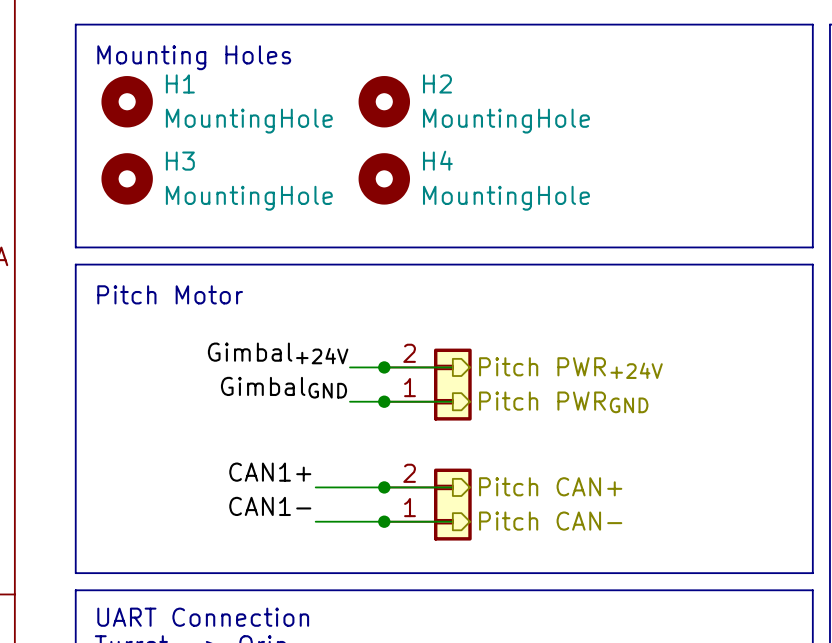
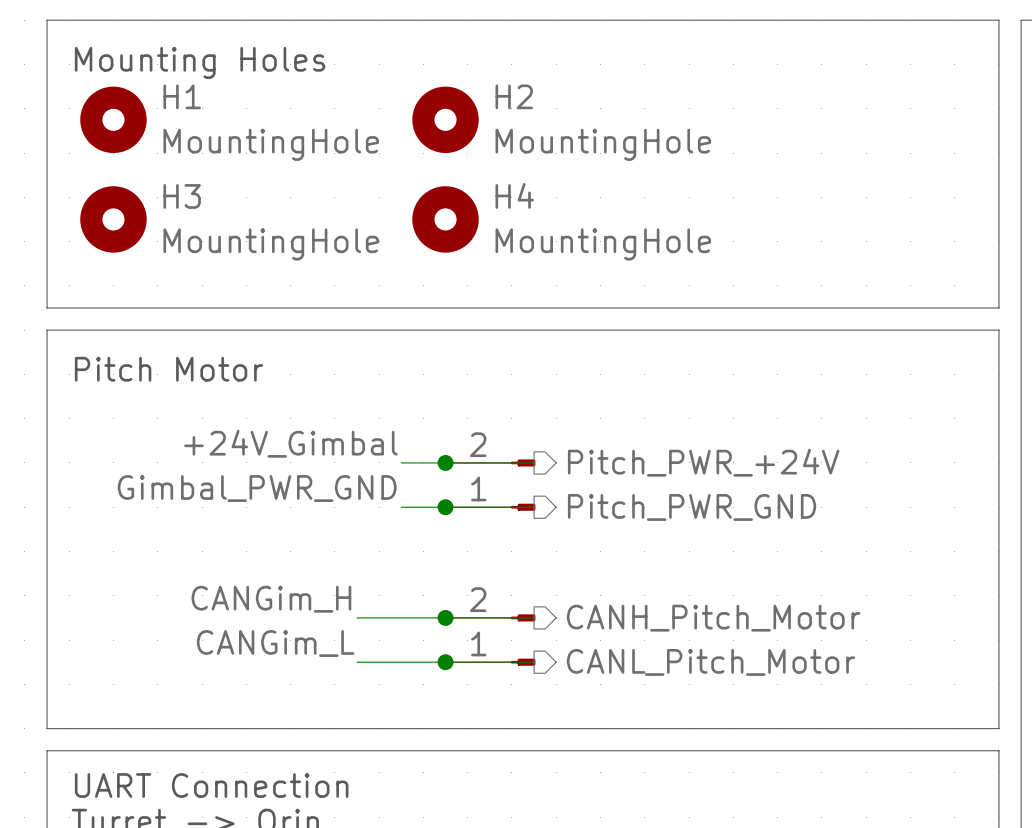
part symbol: [384, 348, 472, 421] -> [445, 459, 536, 511]
label: Gimbal+24V (278, 353) -> +24V_Gimbal (290, 443)
hierarchical label: Pitch PWR+24V (570, 368) -> Pitch_PWR_+24V (703, 462)
label: GimbalGND (284, 387) -> Gimbal_PWR_GND (257, 488)
hierarchical label: Pitch PWRGND (563, 402) -> Pitch_PWR_GND (692, 507)
part symbol: [384, 468, 472, 541] -> [445, 614, 536, 666]
label: CAN1+ (270, 472) -> CANGim_H (271, 599)
hierarchical label: Pitch CAN+ (550, 486) -> CANH_Pitch_Motor (713, 618)
label: CAN1- (270, 506) -> CANGim_L (275, 643)
hierarchical label: Pitch CAN- (550, 521) -> CANL_Pitch_Motor (711, 662)

